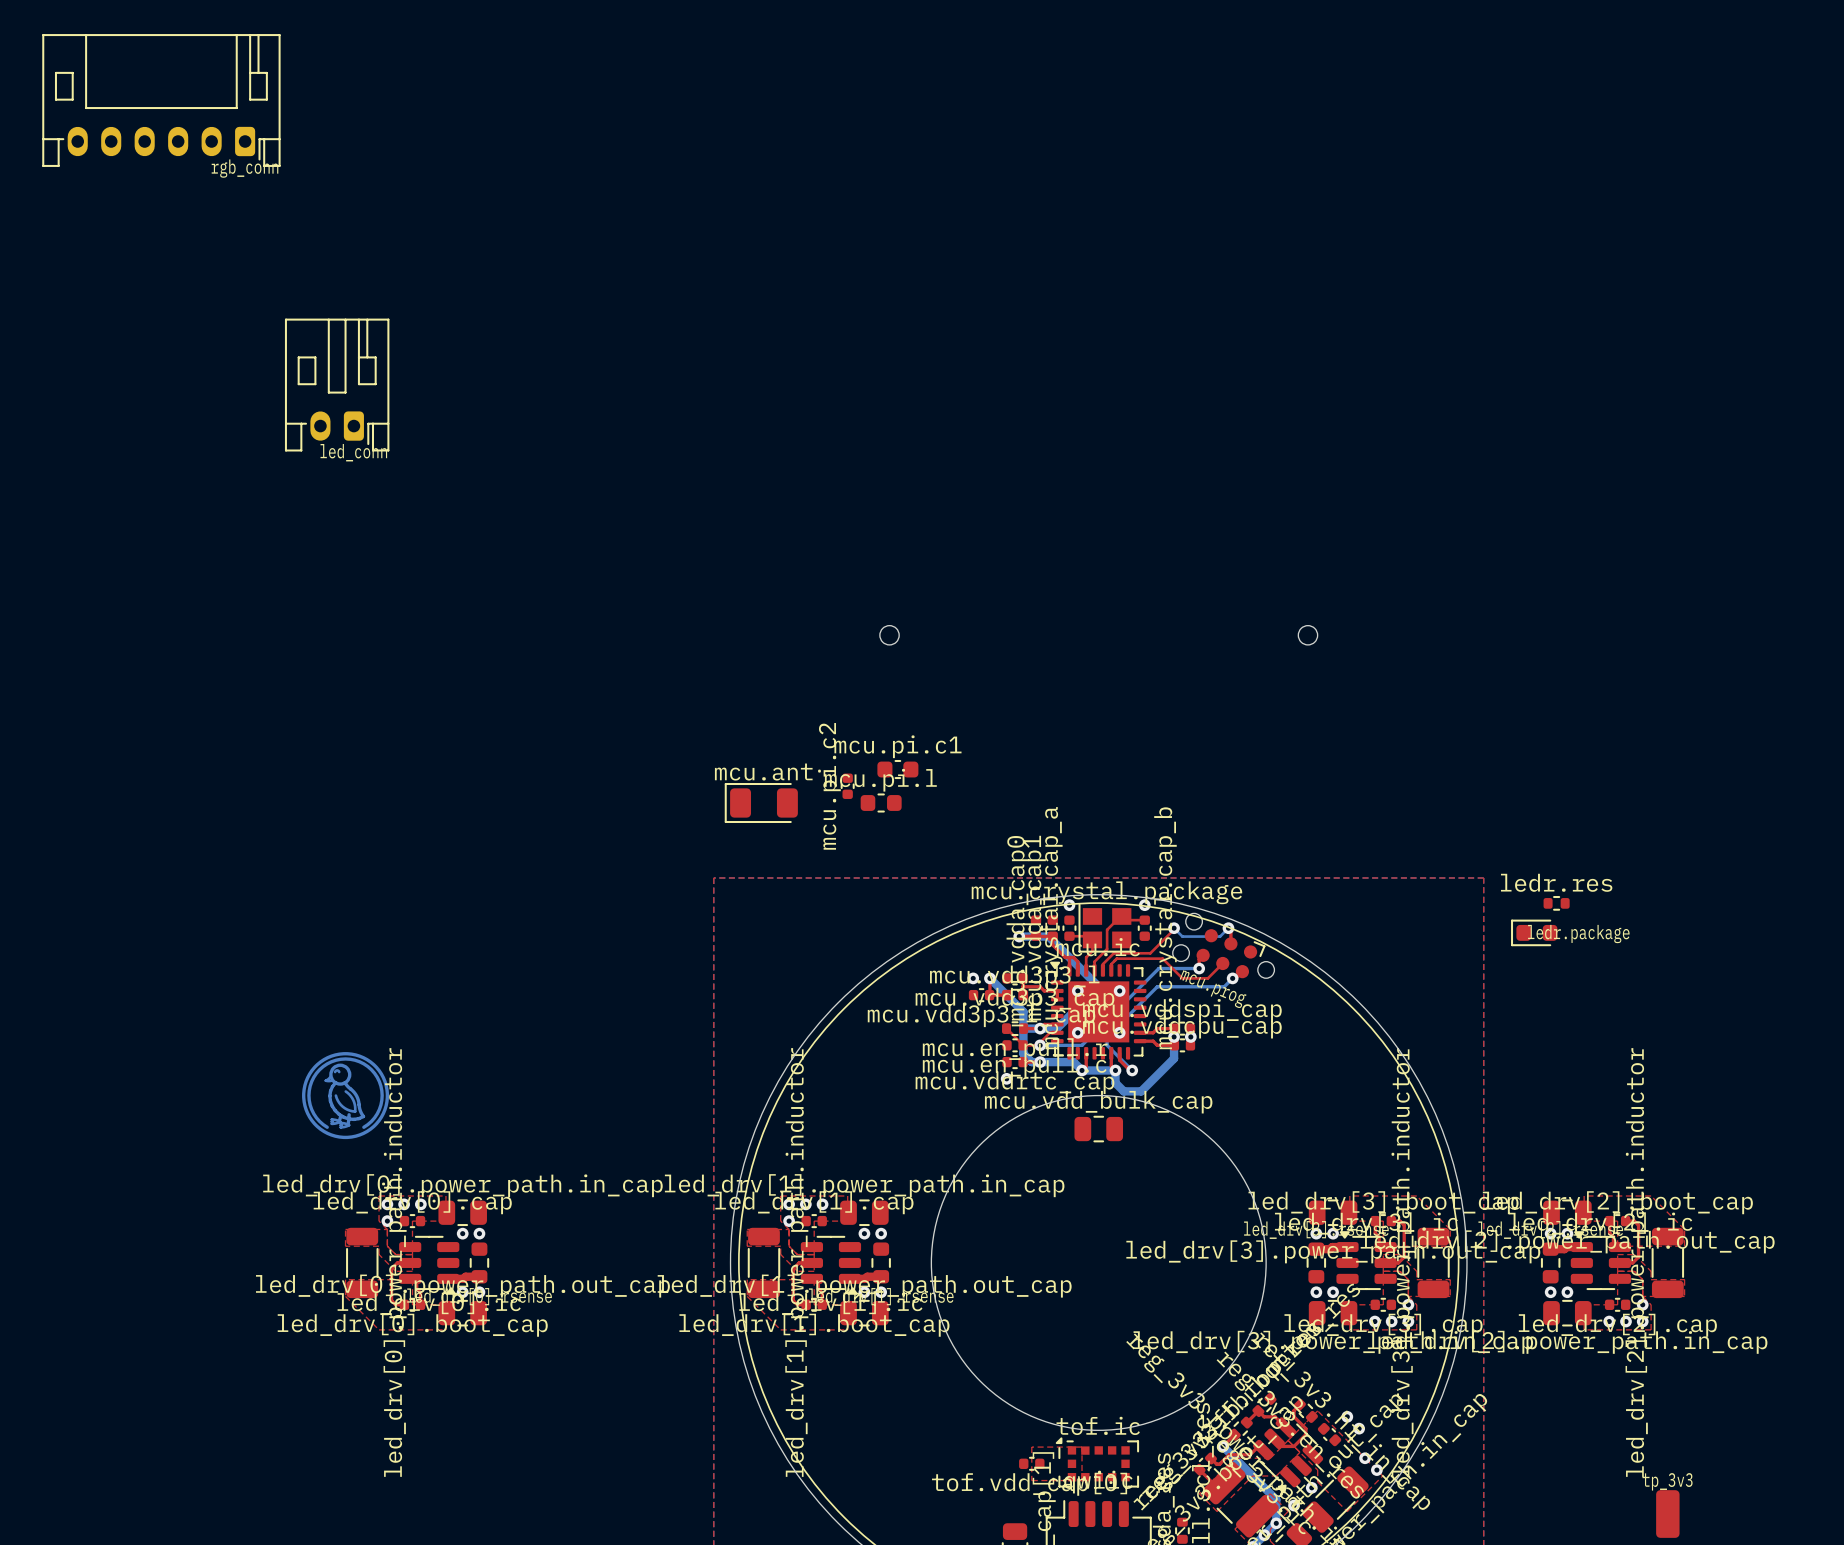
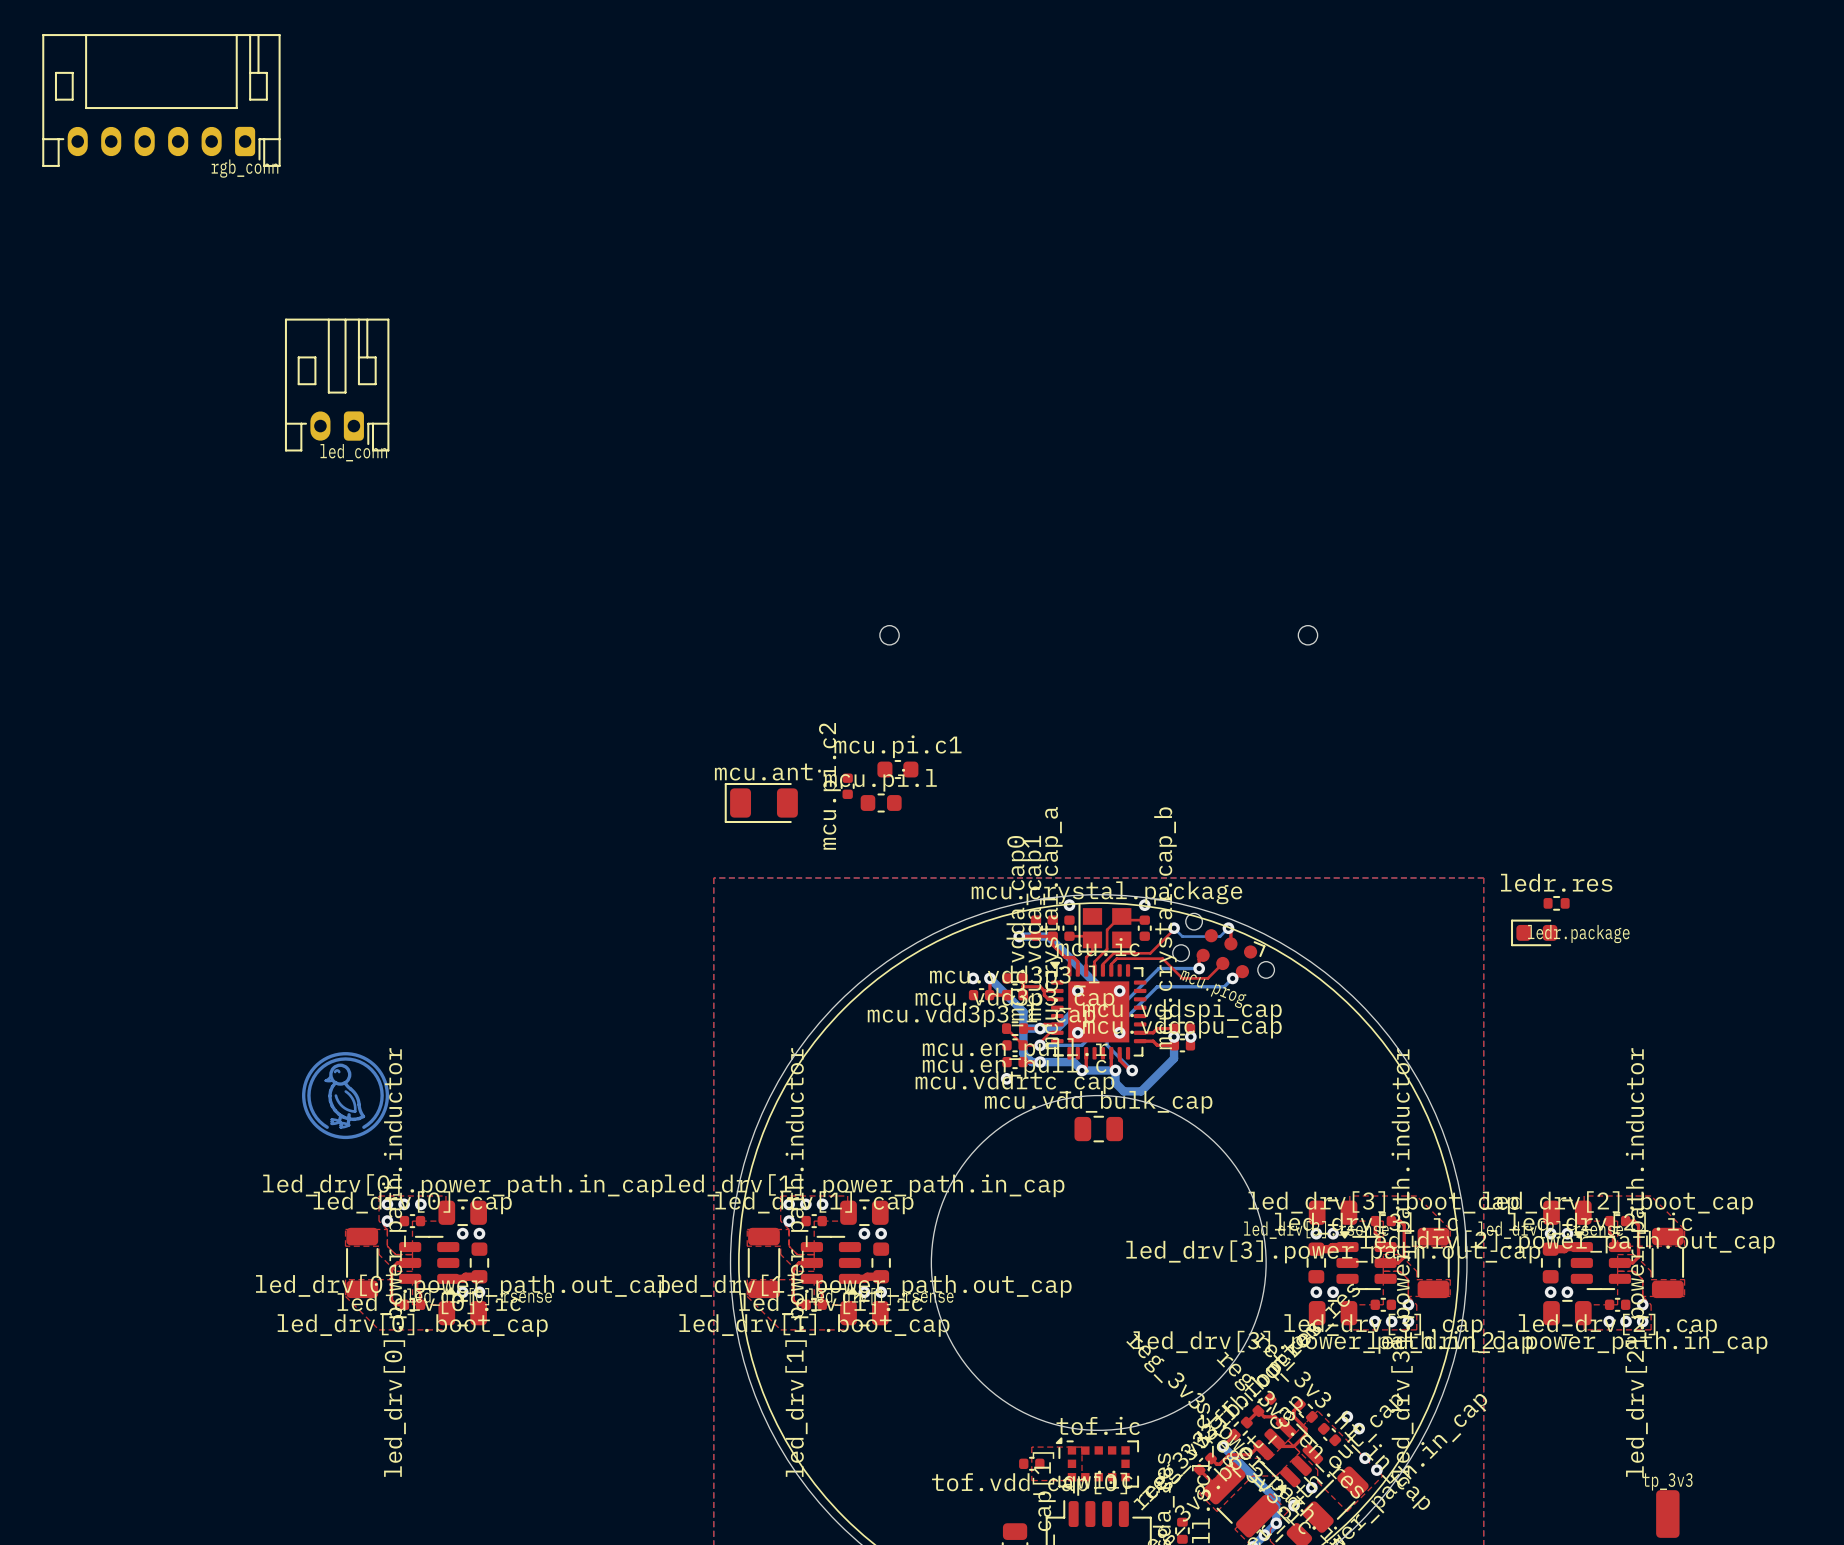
top track: (1057, 990) (1057, 999) -> (1044, 990) (1044, 995) (1048, 999) (1057, 999)

